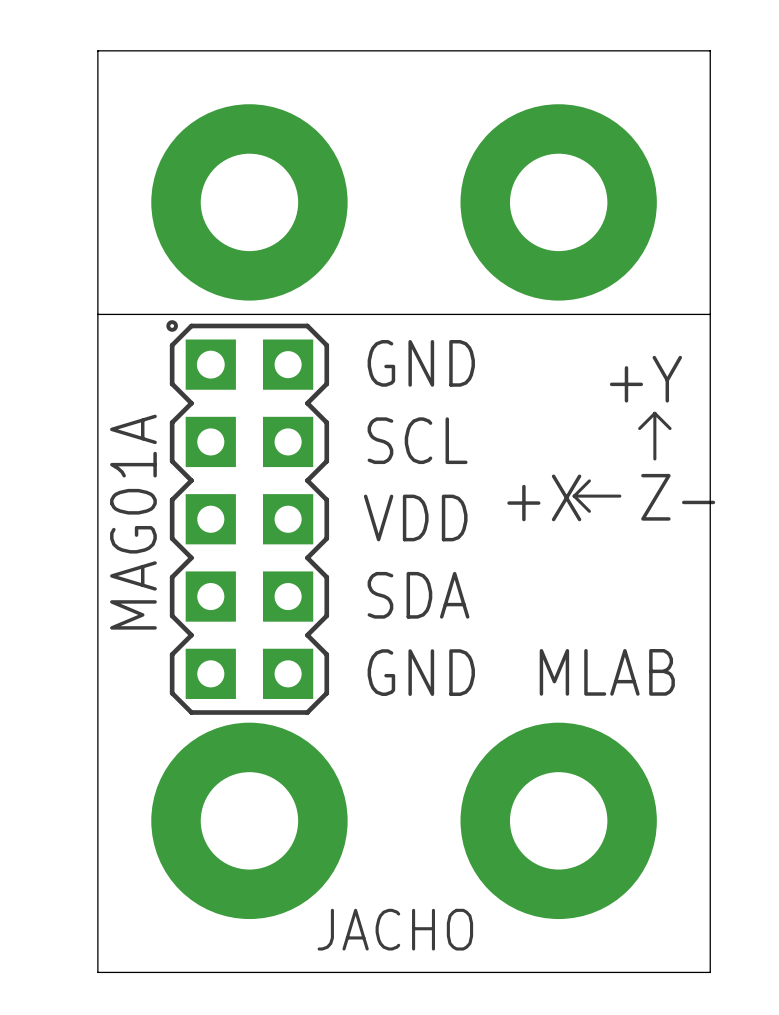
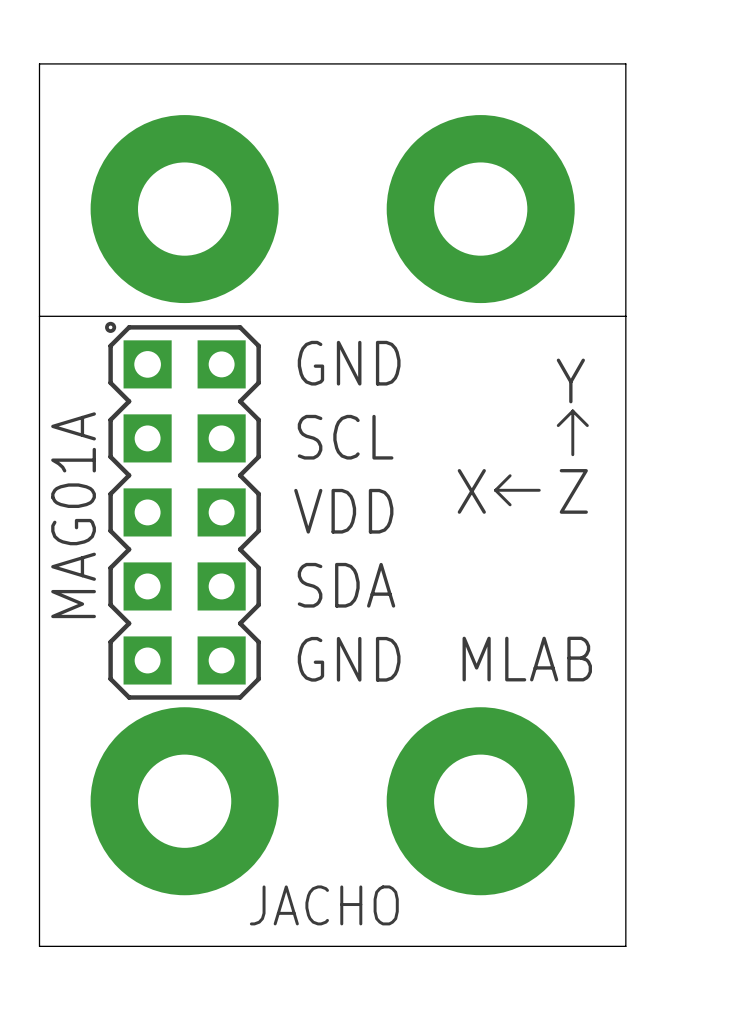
text: +Y (645, 379) -> Y (570, 380)
text: +X (544, 497) -> X (471, 491)
text: Z- (678, 497) -> Z (573, 491)

